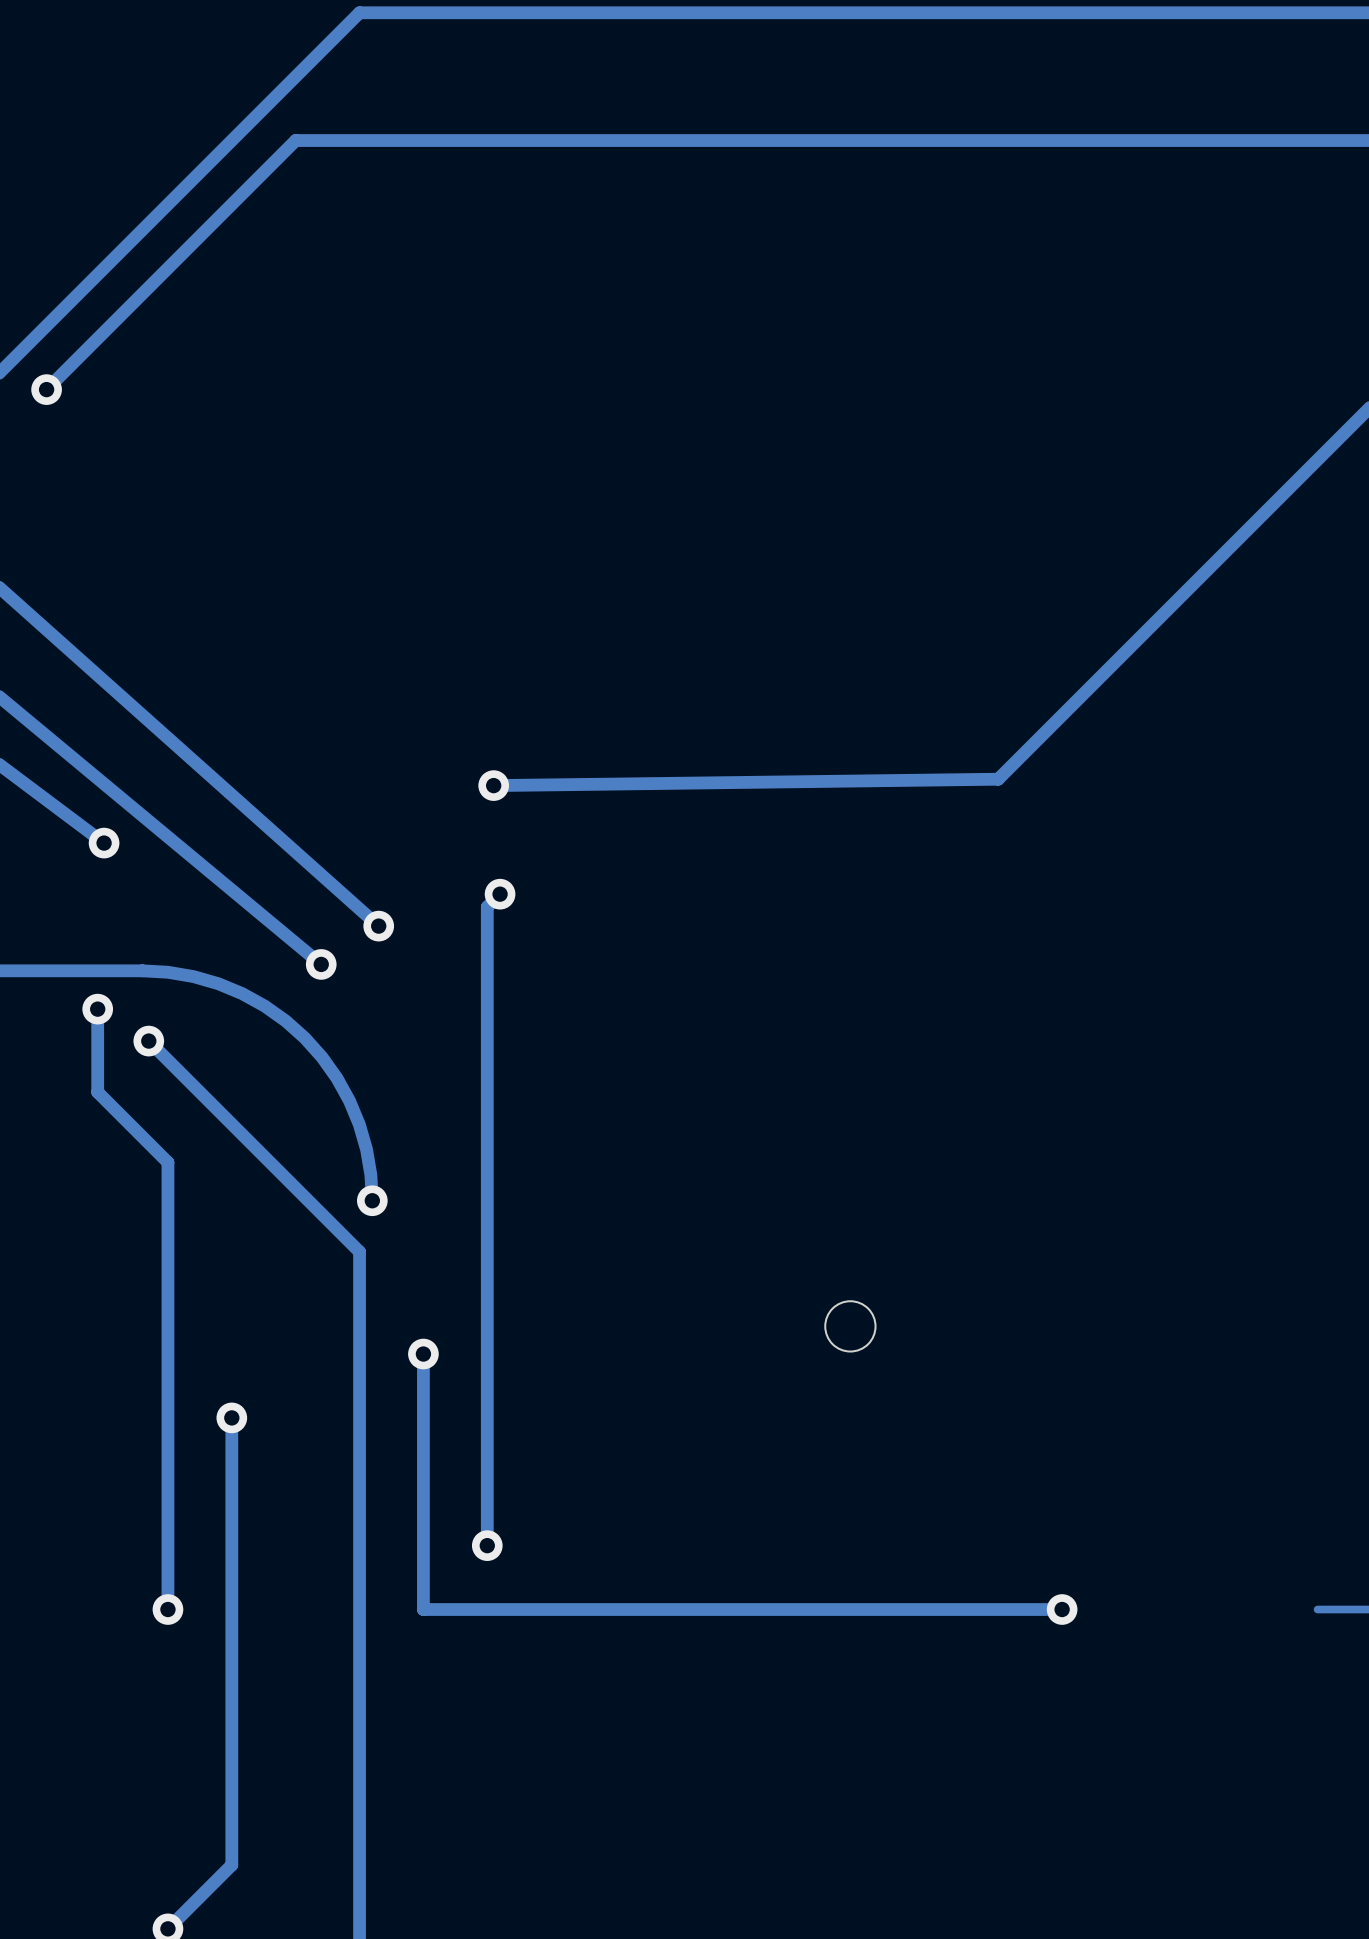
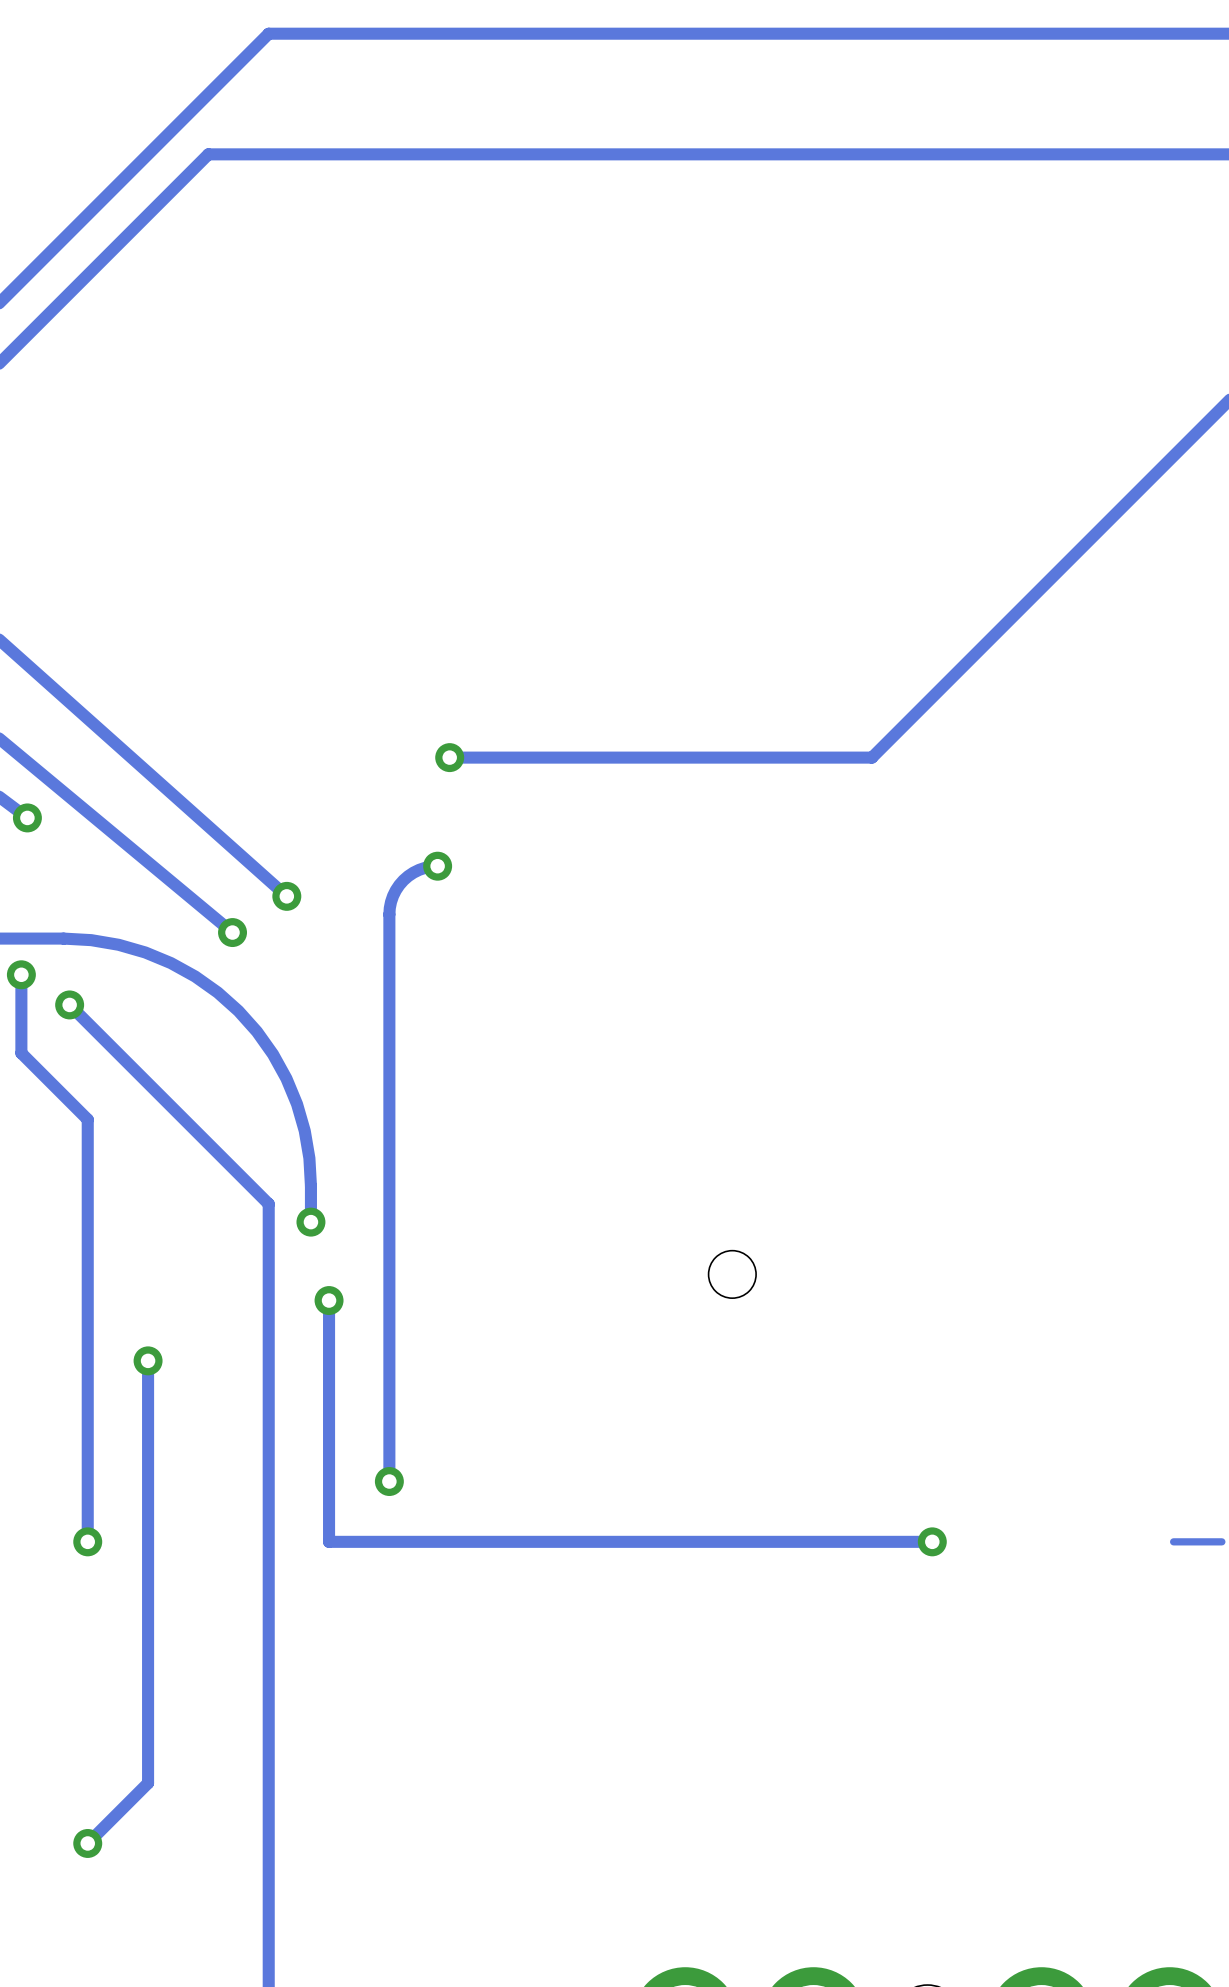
track: (998, 779) (493, 785) -> (871, 757) (449, 757)
via position: (493, 785) -> (449, 757)
track: (500, 894) (487, 906) (487, 945) -> (437, 866) (419, 869) (403, 880) (393, 895) (389, 914)
via position: (500, 894) -> (437, 866)
track: (142, 970) (168, 972) (218, 983) (264, 1006) (304, 1038) (337, 1078) (359, 1124) (366, 1149) (372, 1200) -> (63, 938) (91, 940) (118, 944) (145, 952) (170, 963) (195, 976) (217, 992) (238, 1011) (256, 1031) (273, 1054) (286, 1078) (297, 1104) (304, 1130) (309, 1158) (310, 1222)
via position: (372, 1200) -> (310, 1222)

